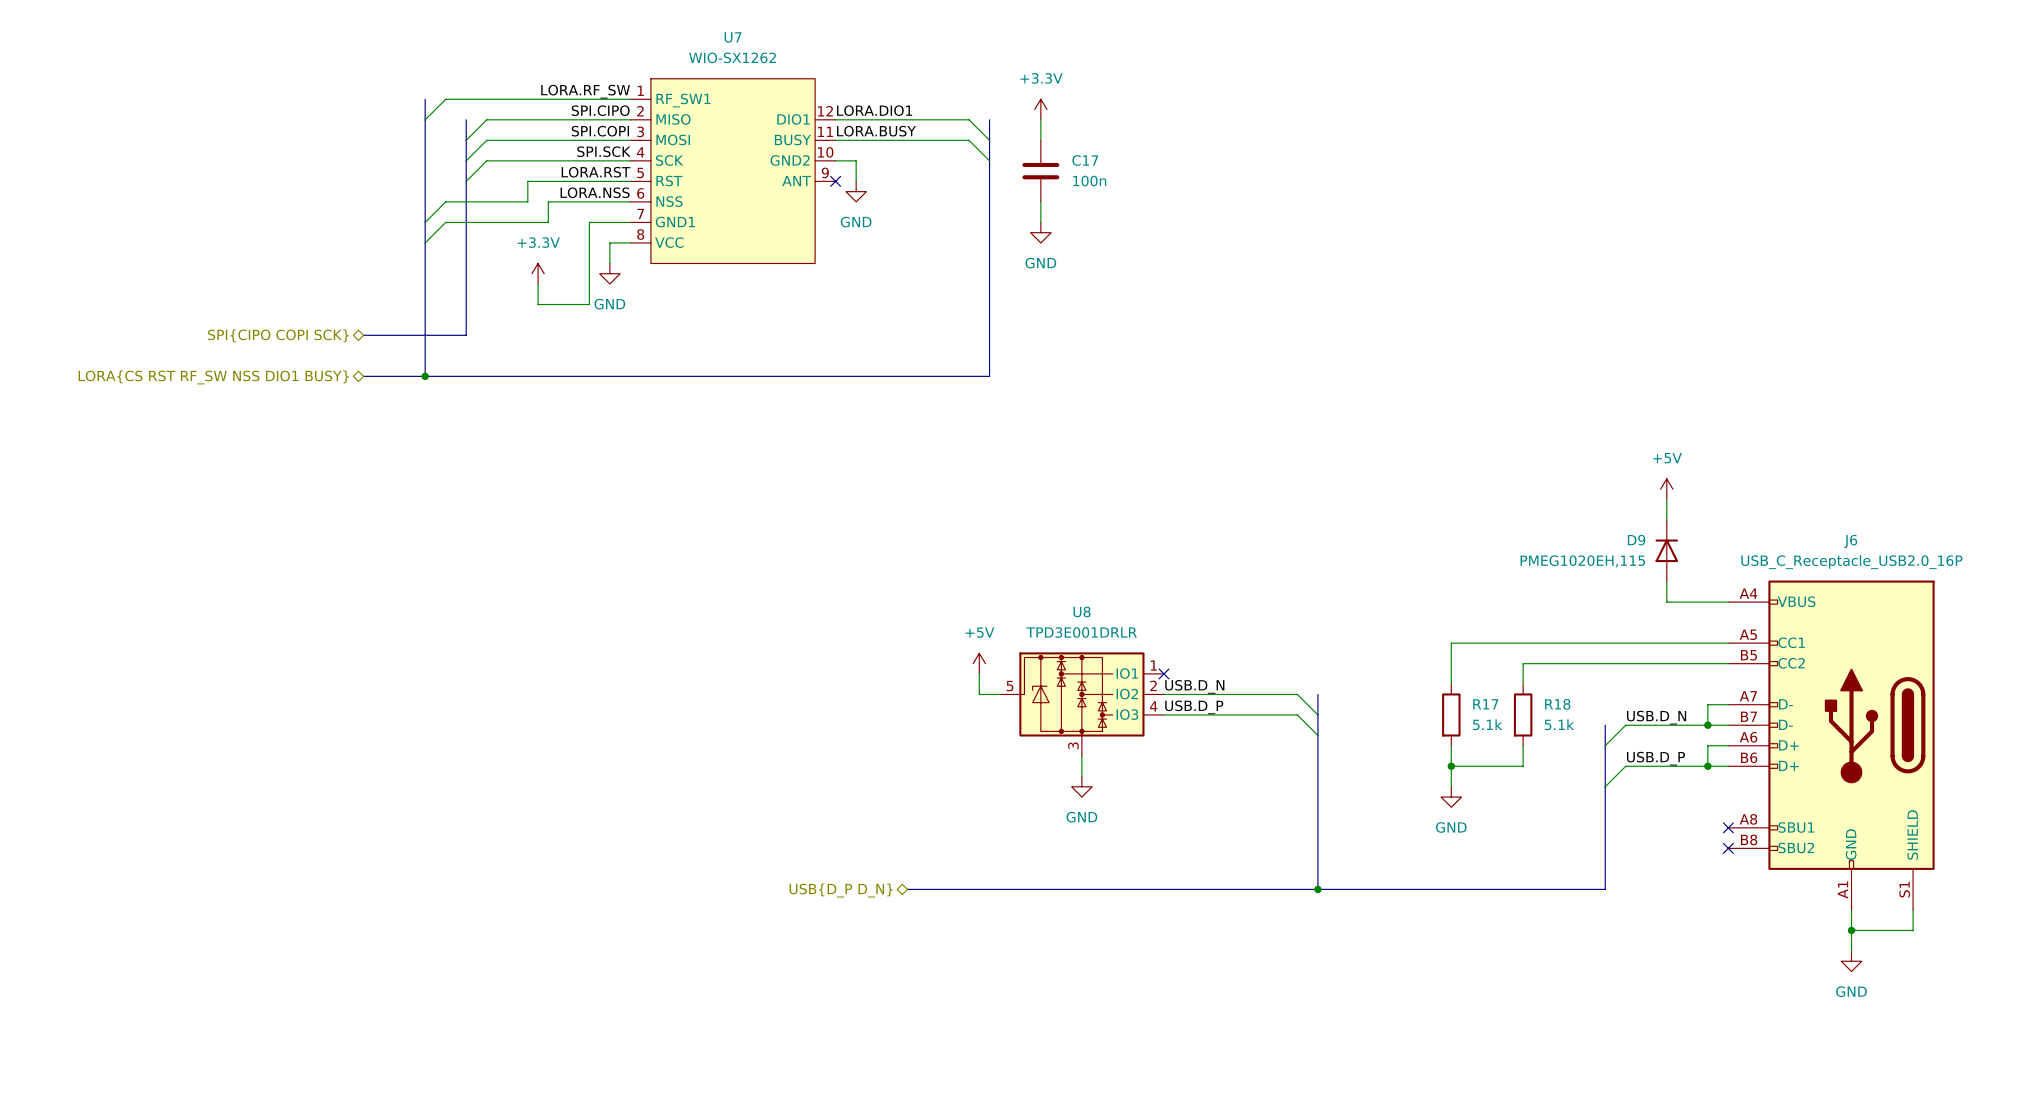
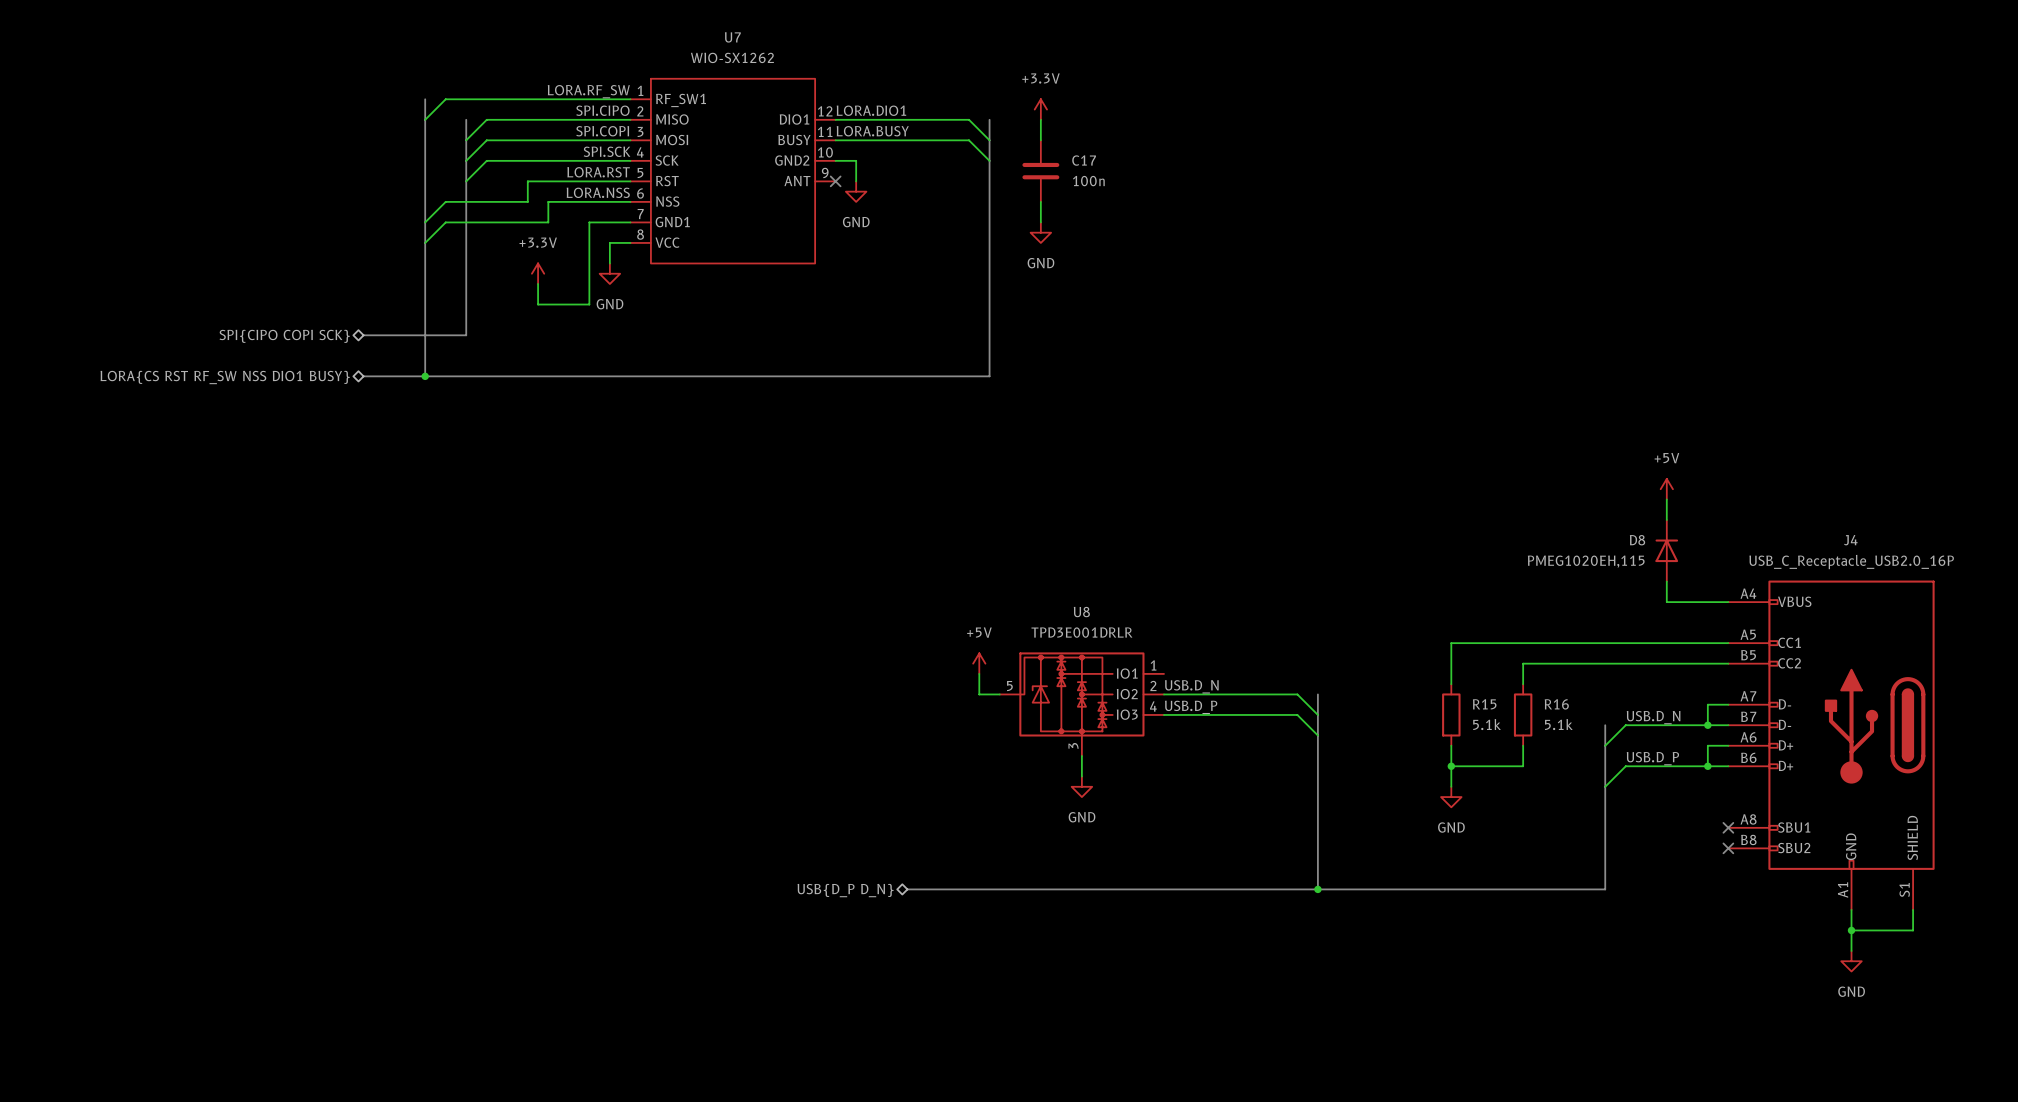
D9 name: D9 (1636, 540) -> D8 (1637, 540)
J6 name: J6 (1850, 541) -> J4 (1850, 540)
no-connect mark: (1164, 673) -> none
R17 name: R17 (1485, 704) -> R15 (1484, 704)
R18 name: R18 (1557, 704) -> R16 (1556, 704)

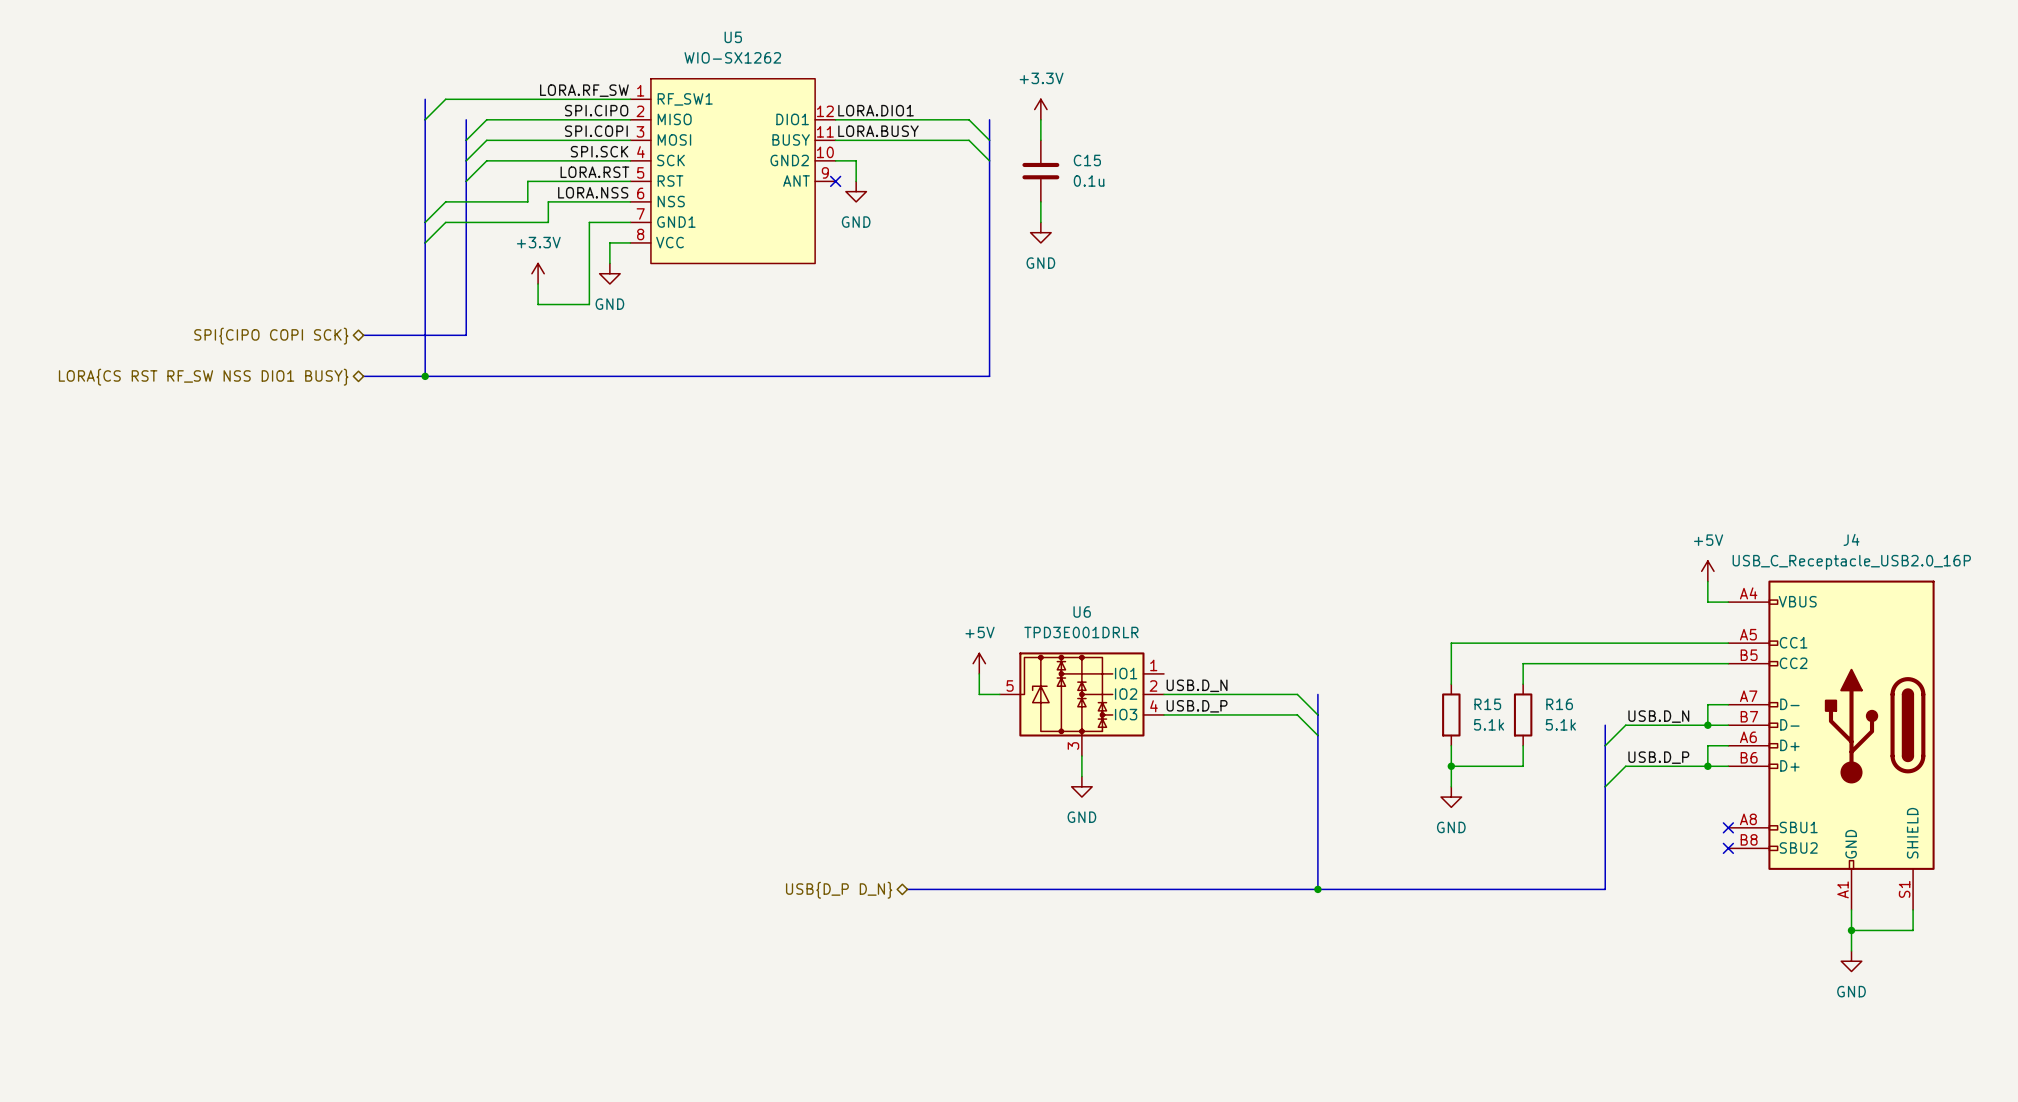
U7 name: U7 (732, 37) -> U5 (733, 37)
C17 name: C17 (1084, 160) -> C15 (1087, 160)
C17 value: 100n (1088, 181) -> 0.1u (1089, 181)
power symbol position: +5V (1666, 489) -> +5V (1707, 571)
wire: (1666, 499) (1666, 520) -> none
D8: PMEG1020EH,115 (1666, 550) -> none
wire: (1666, 581) (1666, 602) (1707, 602) -> (1707, 581) (1707, 602)
U8 name: U8 (1081, 612) -> U6 (1082, 611)

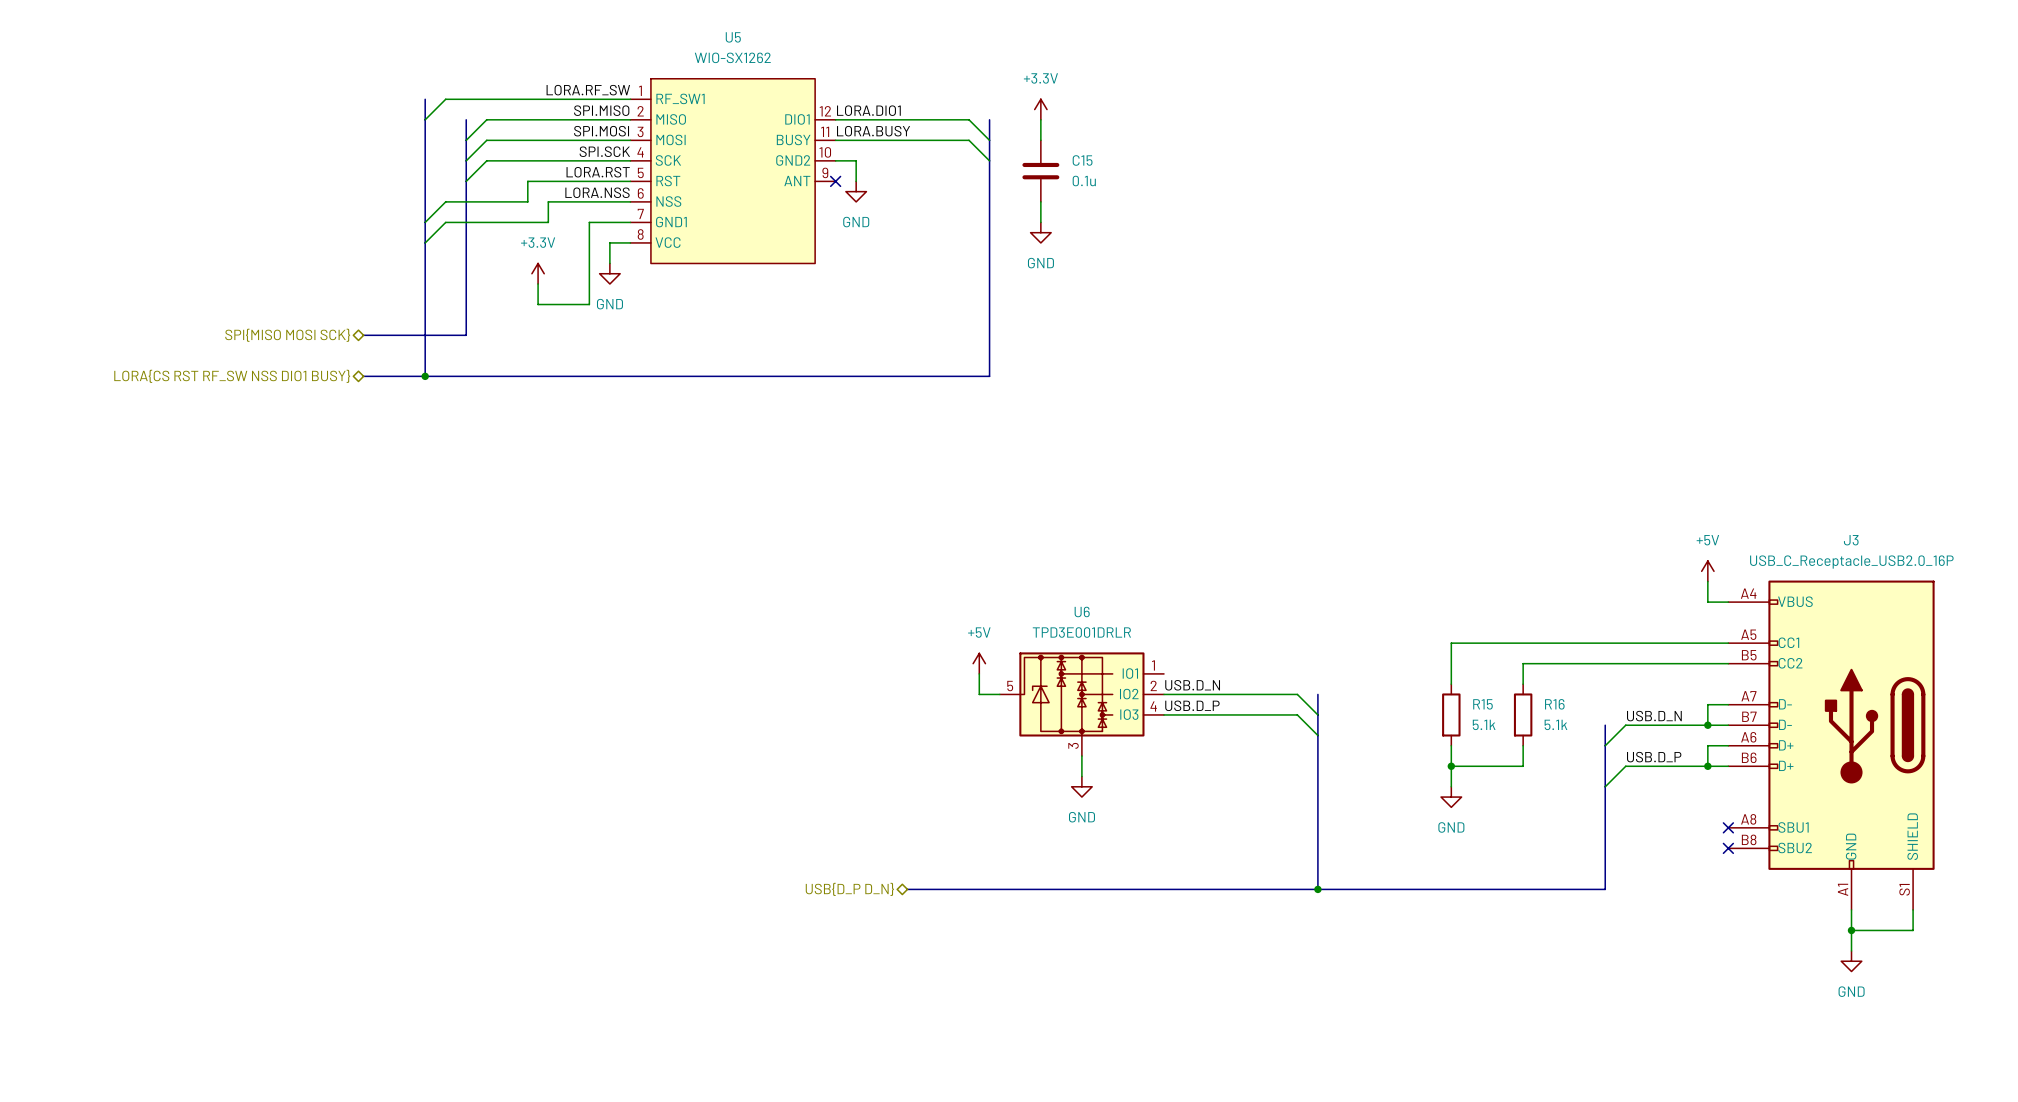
label: SPI.CIPO (596, 110) -> SPI.MISO (601, 110)
label: SPI.COPI (596, 131) -> SPI.MOSI (601, 131)
hierarchical label: SPI{CIPO COPI SCK} (271, 336) -> SPI{MISO MOSI SCK} (287, 335)
J4 name: J4 (1851, 539) -> J3 (1851, 540)

